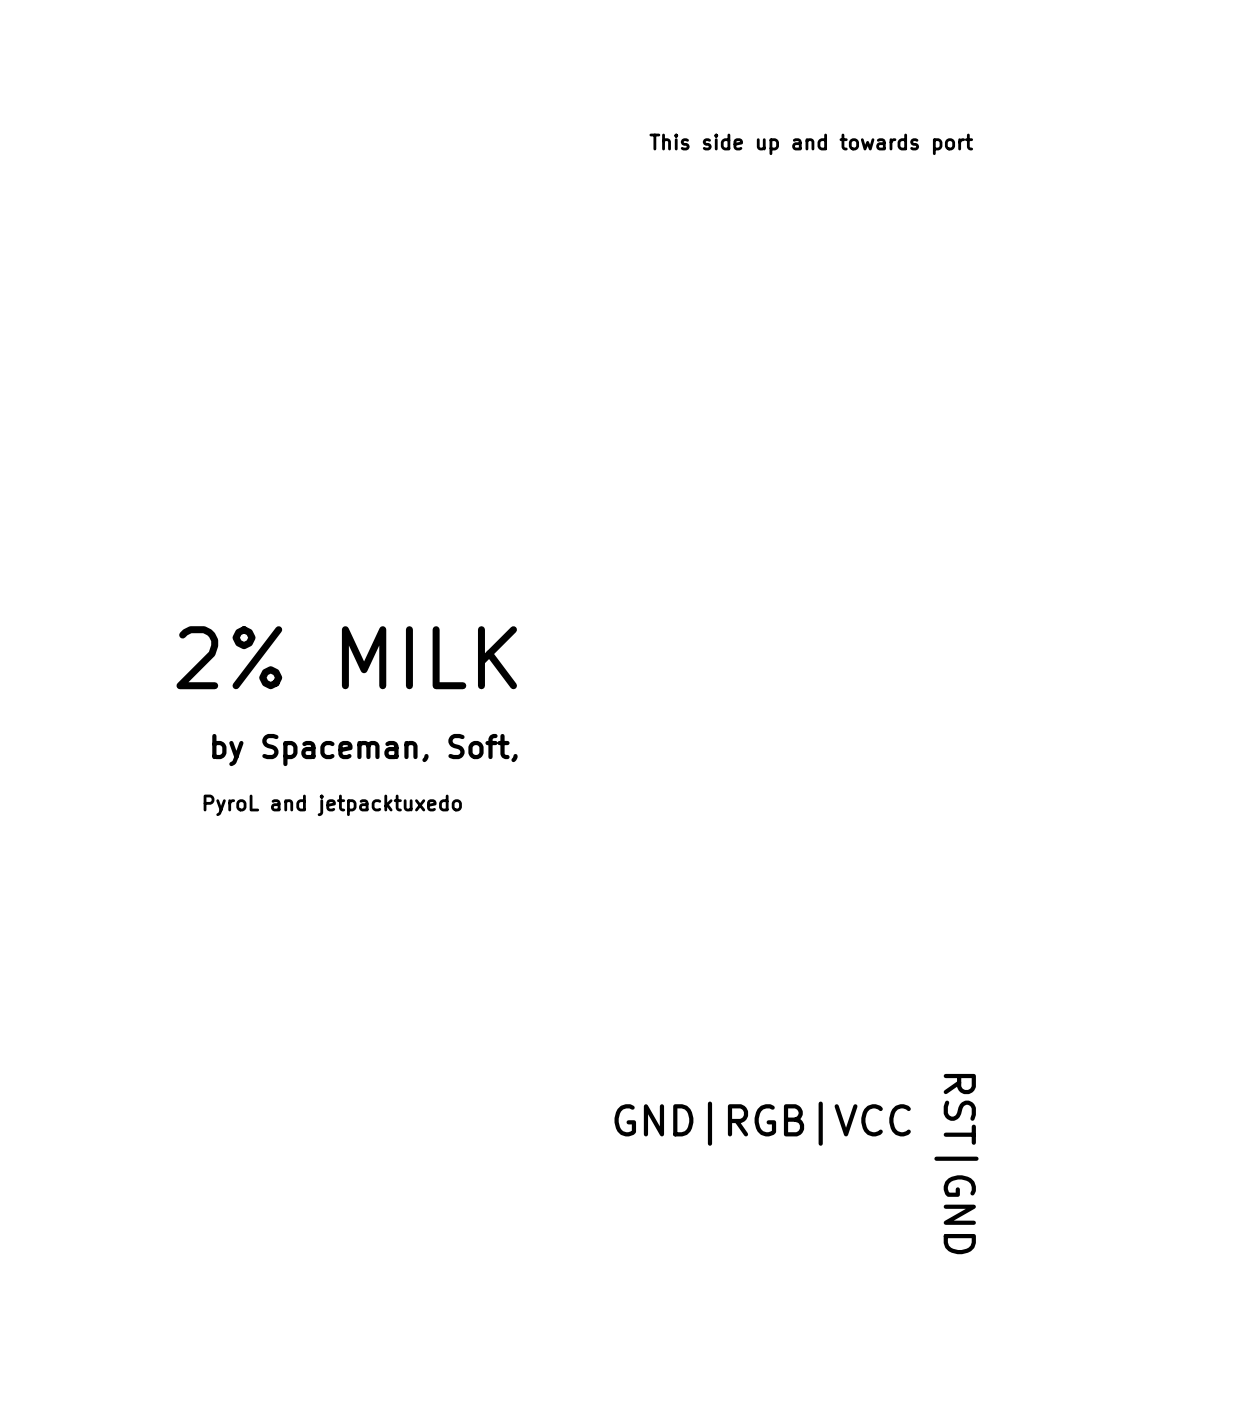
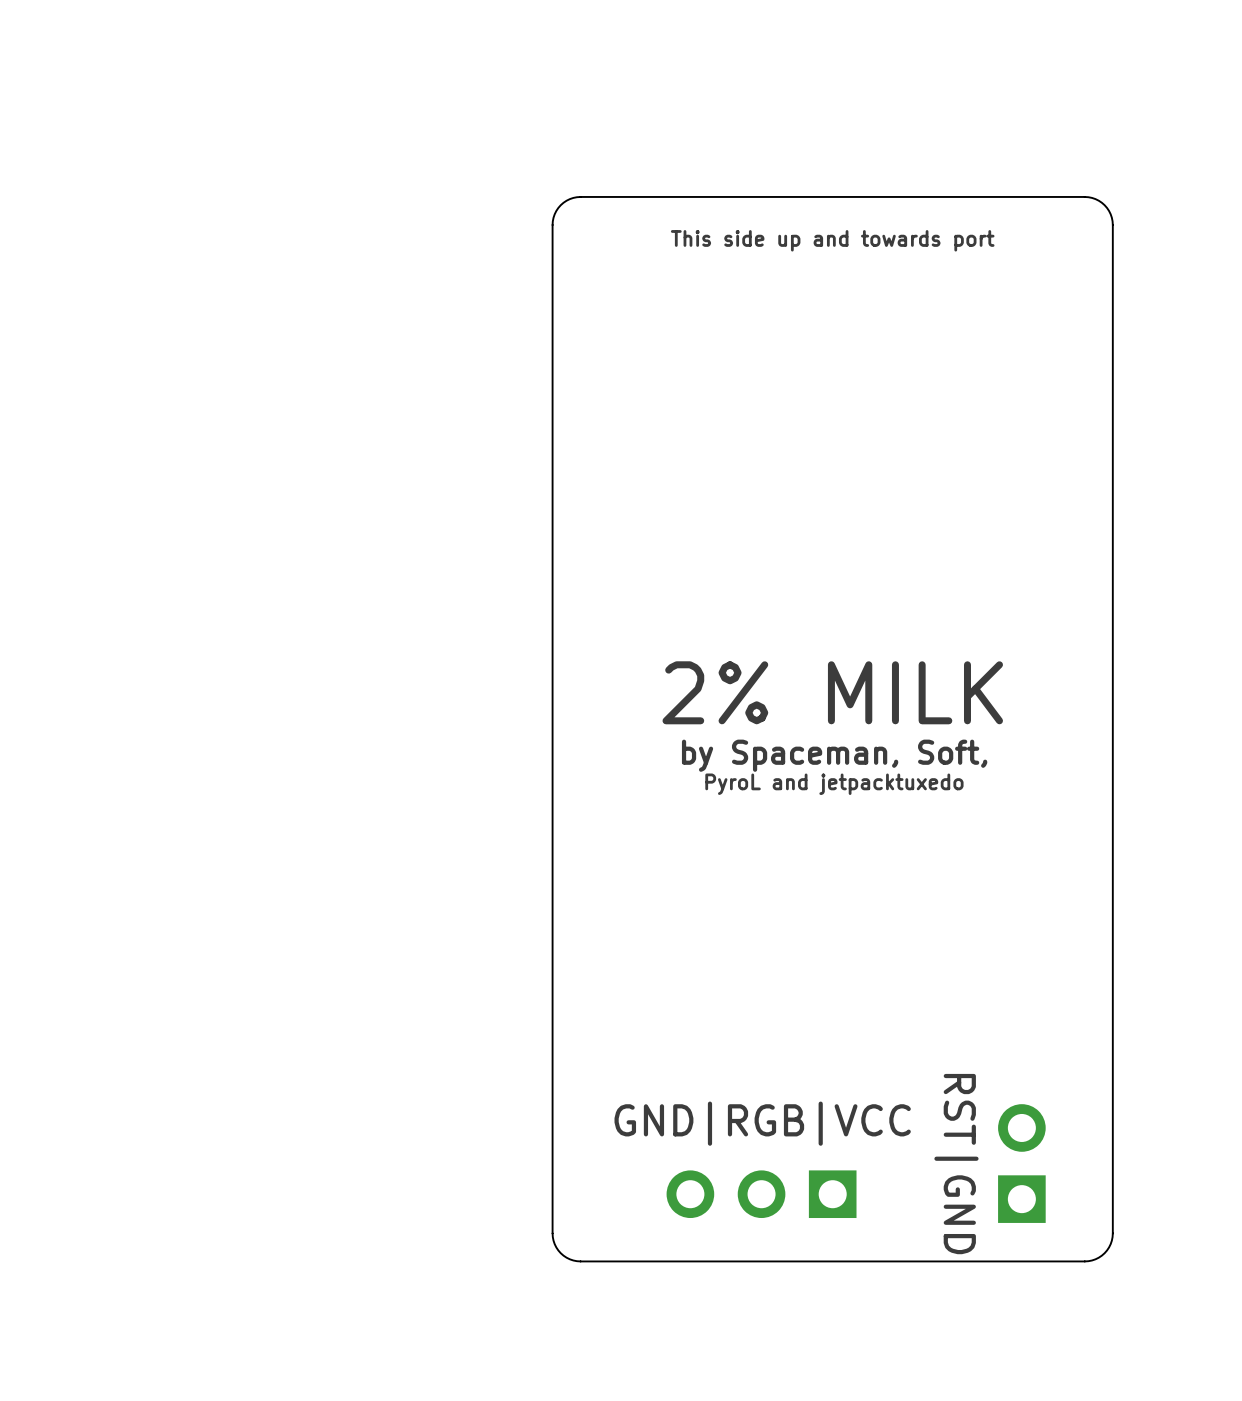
text position: This side up and towards port (811, 144) -> This side up and towards port (832, 240)
board edge: none -> (580, 196) (1084, 196) (1098, 200) (1110, 214) (1112, 224) (1112, 1233) (1107, 1250) (1095, 1259) (1084, 1261) (580, 1261) (563, 1255) (554, 1244) (552, 1233) (552, 224) (554, 214) (560, 205) (569, 199) (580, 196)
text position: 2% MILK (346, 657) -> 2% MILK (832, 692)
text position: by Spaceman, Soft, (364, 750) -> by Spaceman, Soft, (834, 755)
text position: PyroL and jetpacktuxedo (332, 805) -> PyroL and jetpacktuxedo (834, 784)
part: none -> (1021, 1163)
part: none -> (761, 1194)

